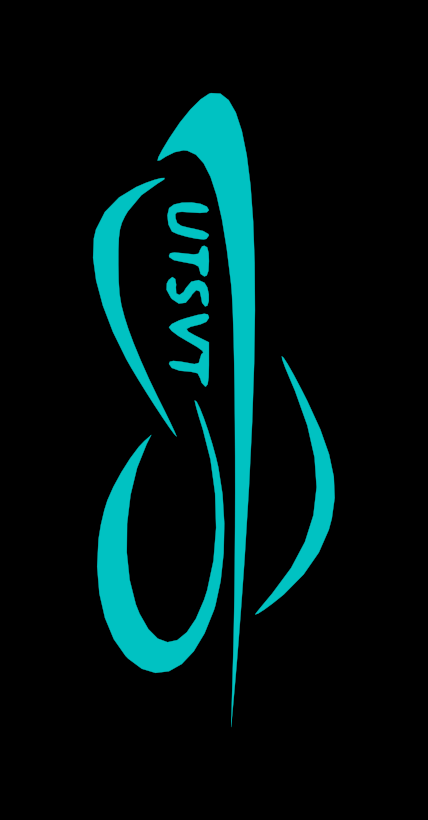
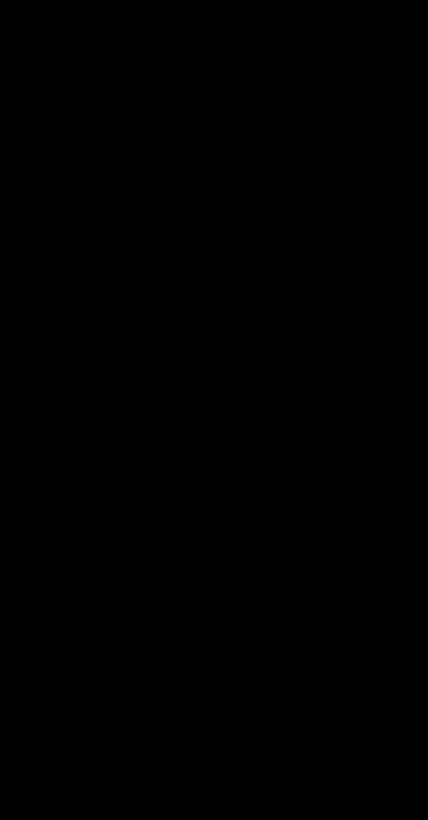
drawing: [92, 92, 335, 728] -> none

